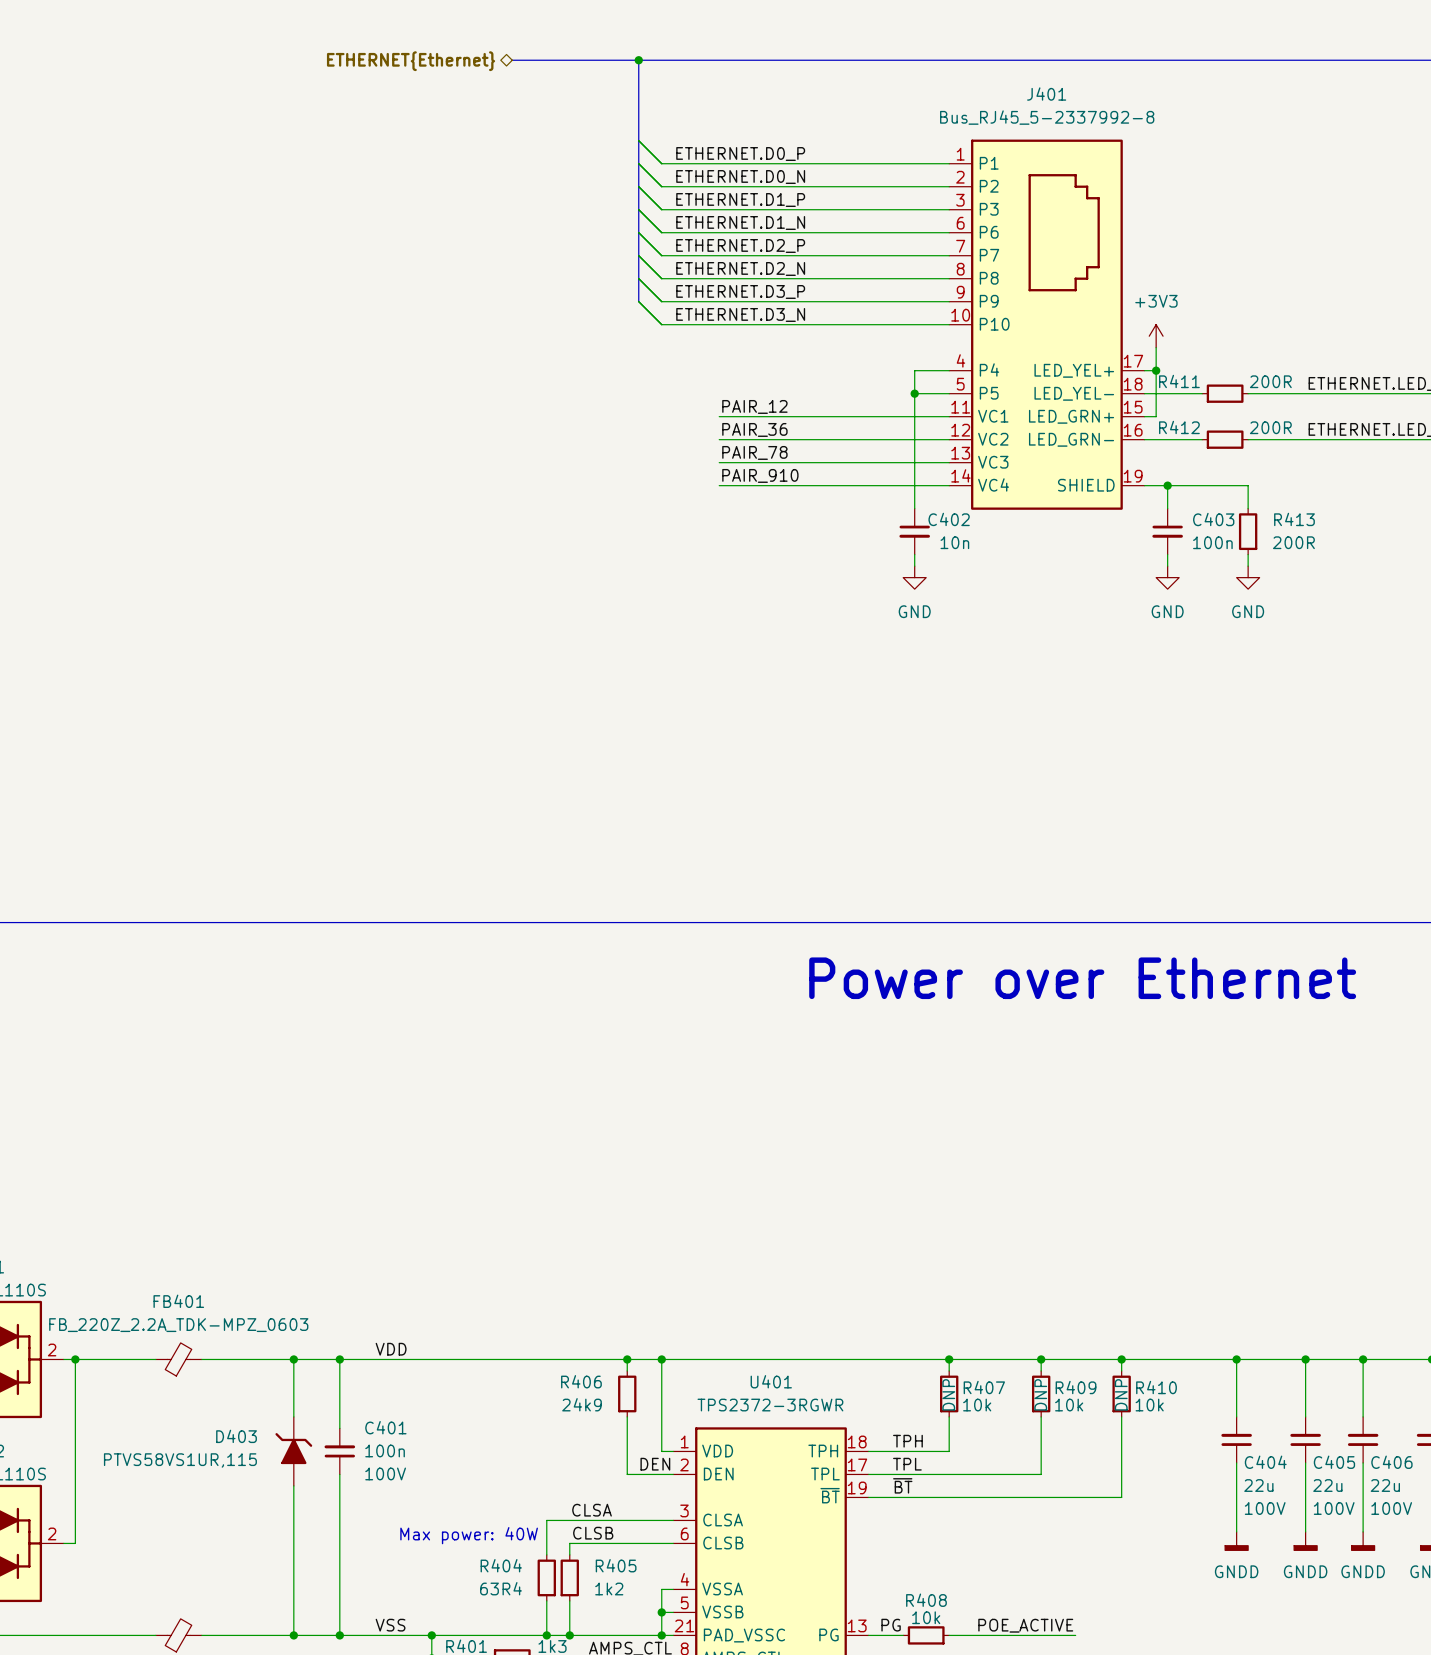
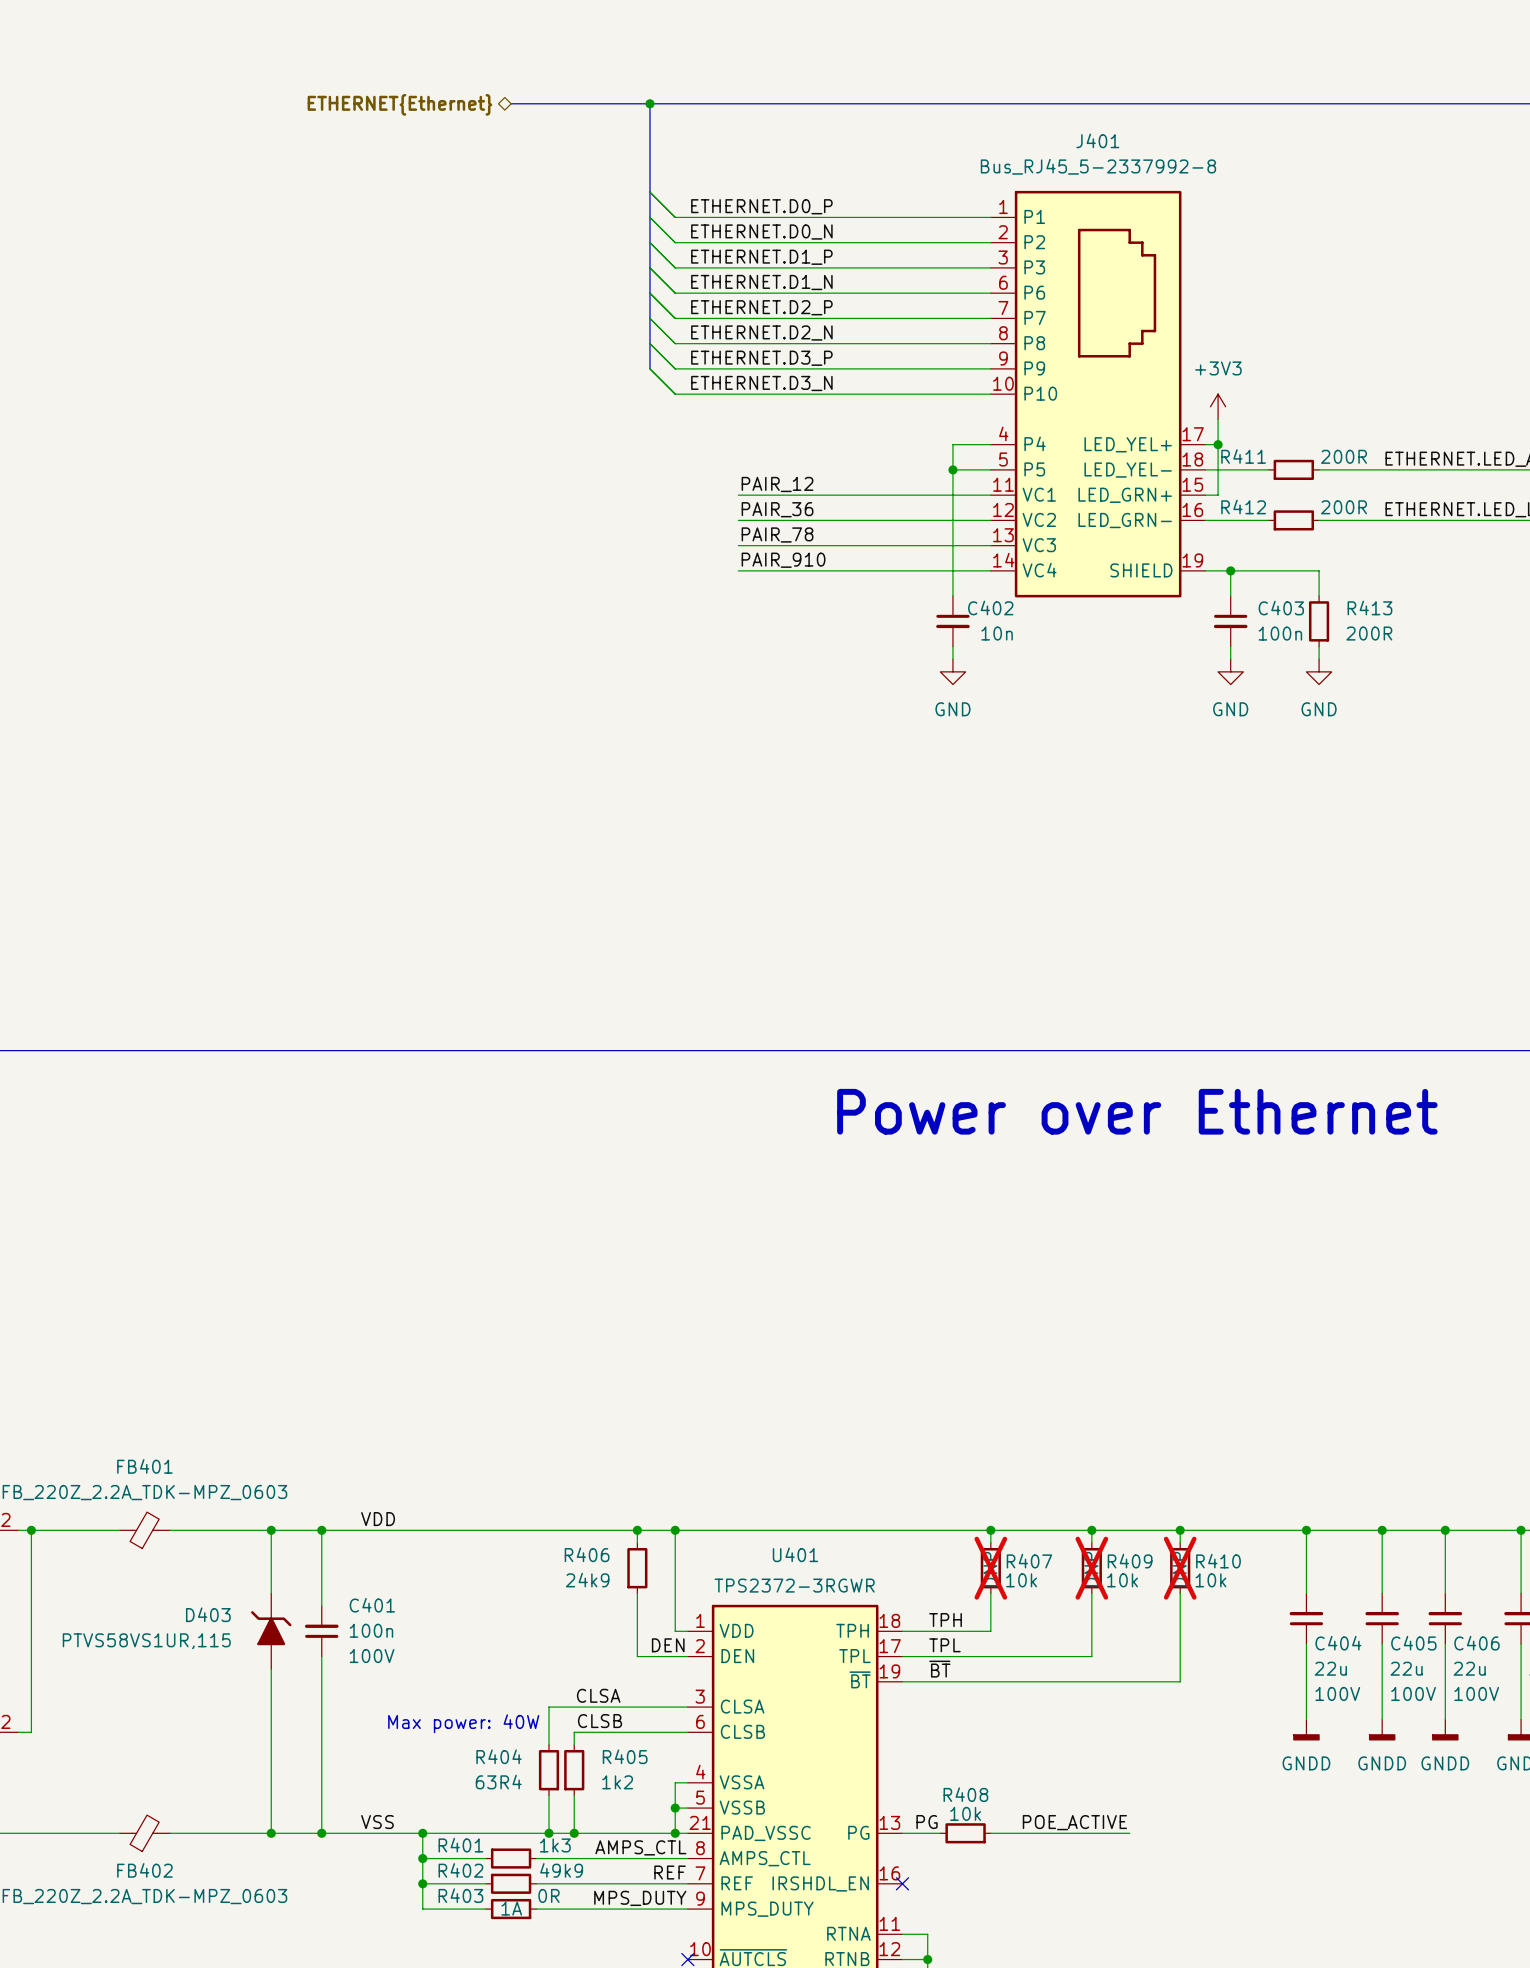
R407 do-not-place cross: none -> (990, 1568)
R409 do-not-place cross: none -> (1091, 1568)
R410 do-not-place cross: none -> (1180, 1568)
U401 value: TPS2372-3RGWR (770, 1405) -> none
U401 text: none -> TPS2372-3RGWR (794, 1585)

